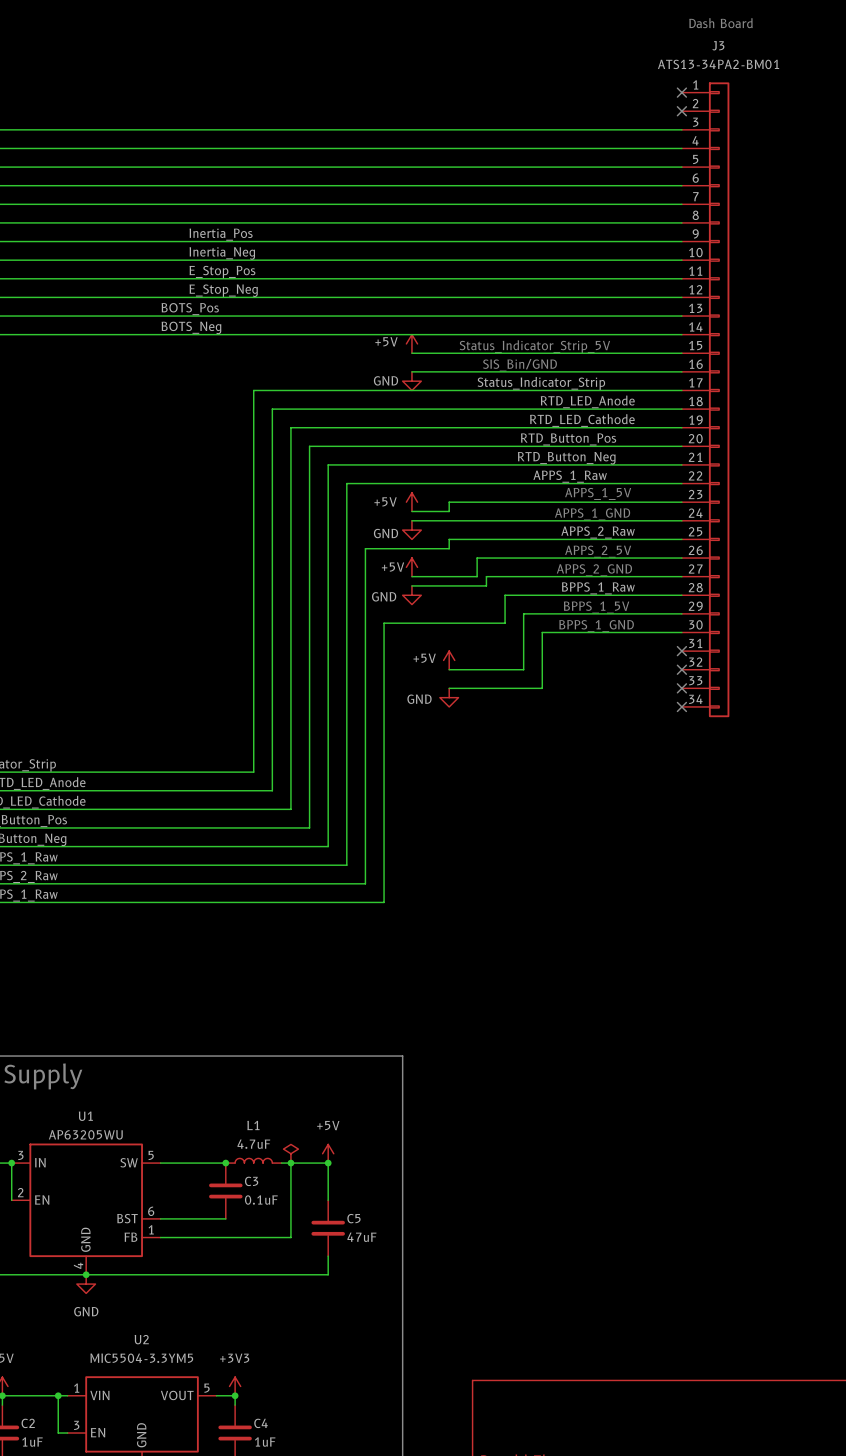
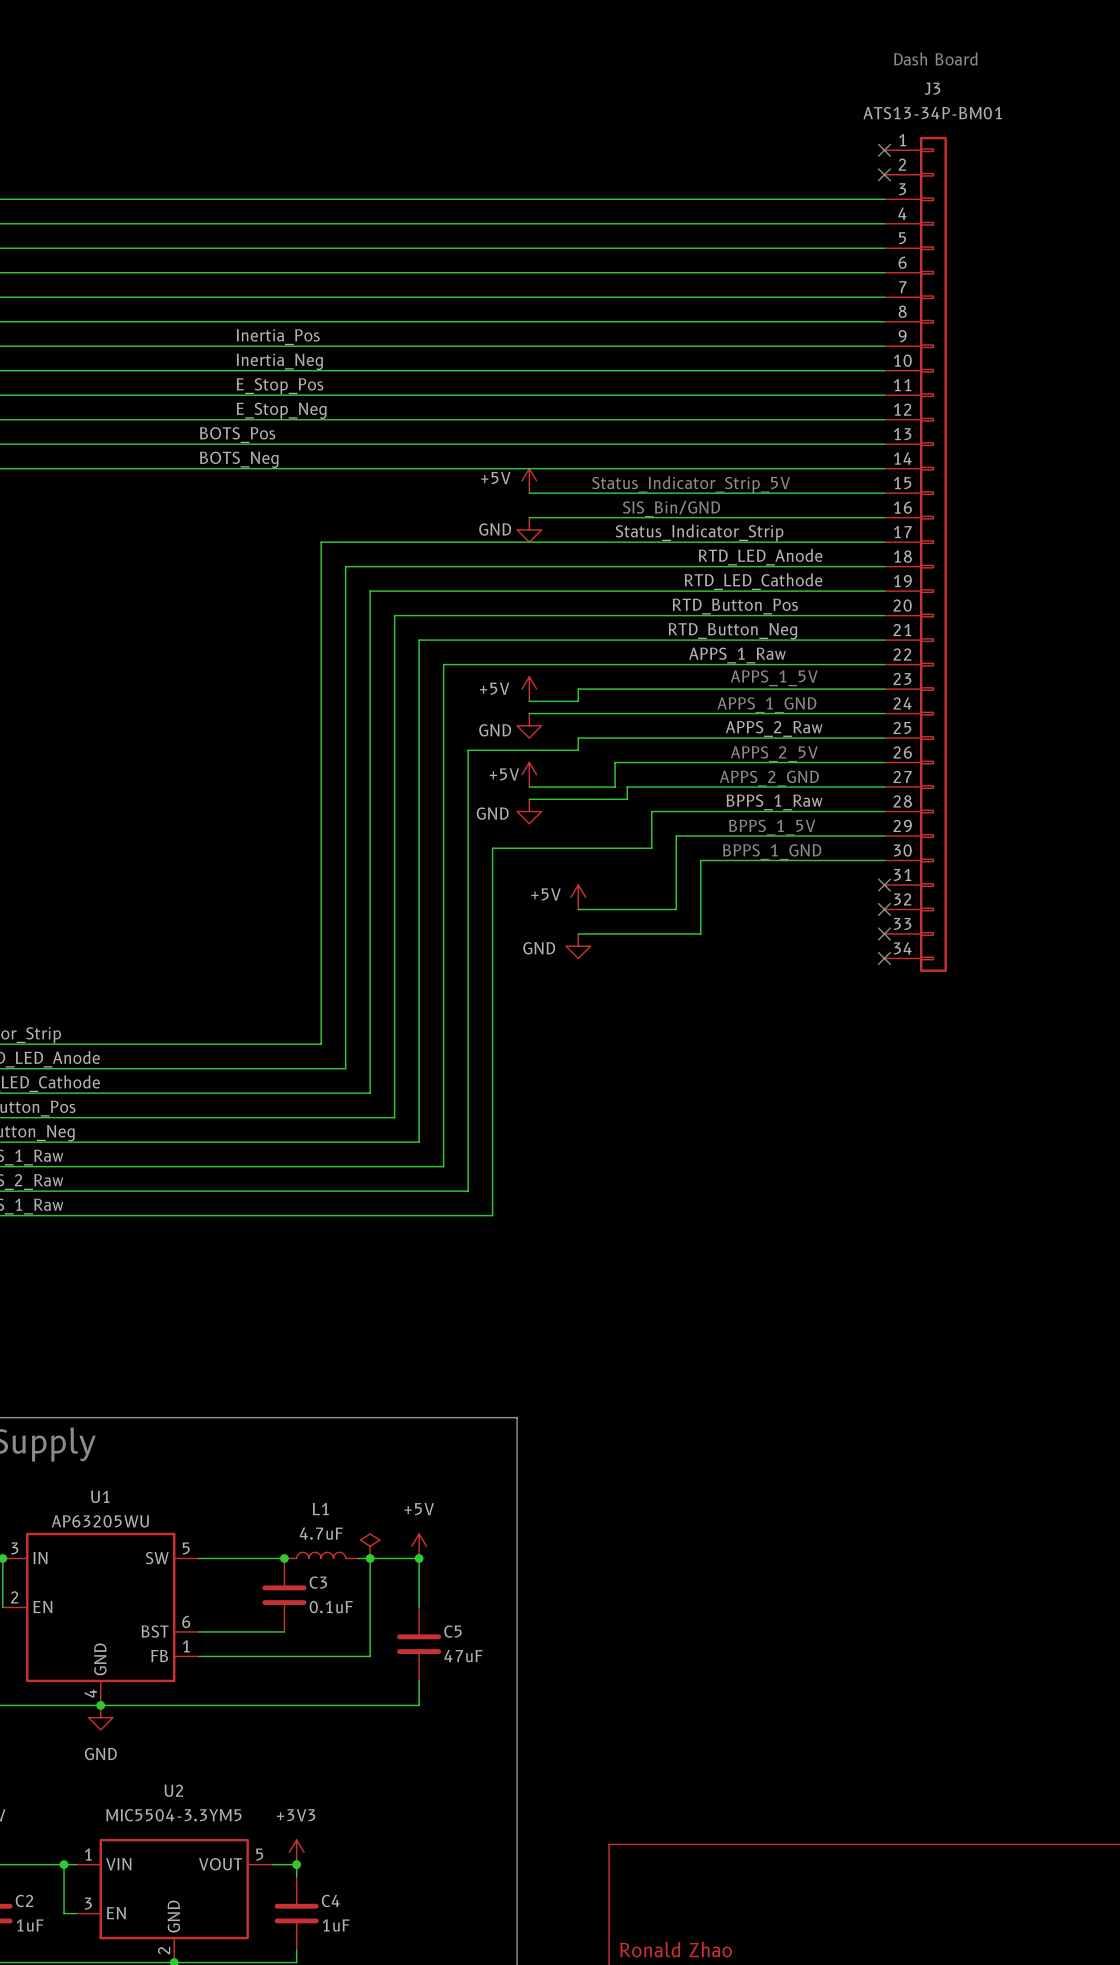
J3 value: ATS13-34PA2-BM01 (718, 64) -> ATS13-34P-BM01 (932, 113)

